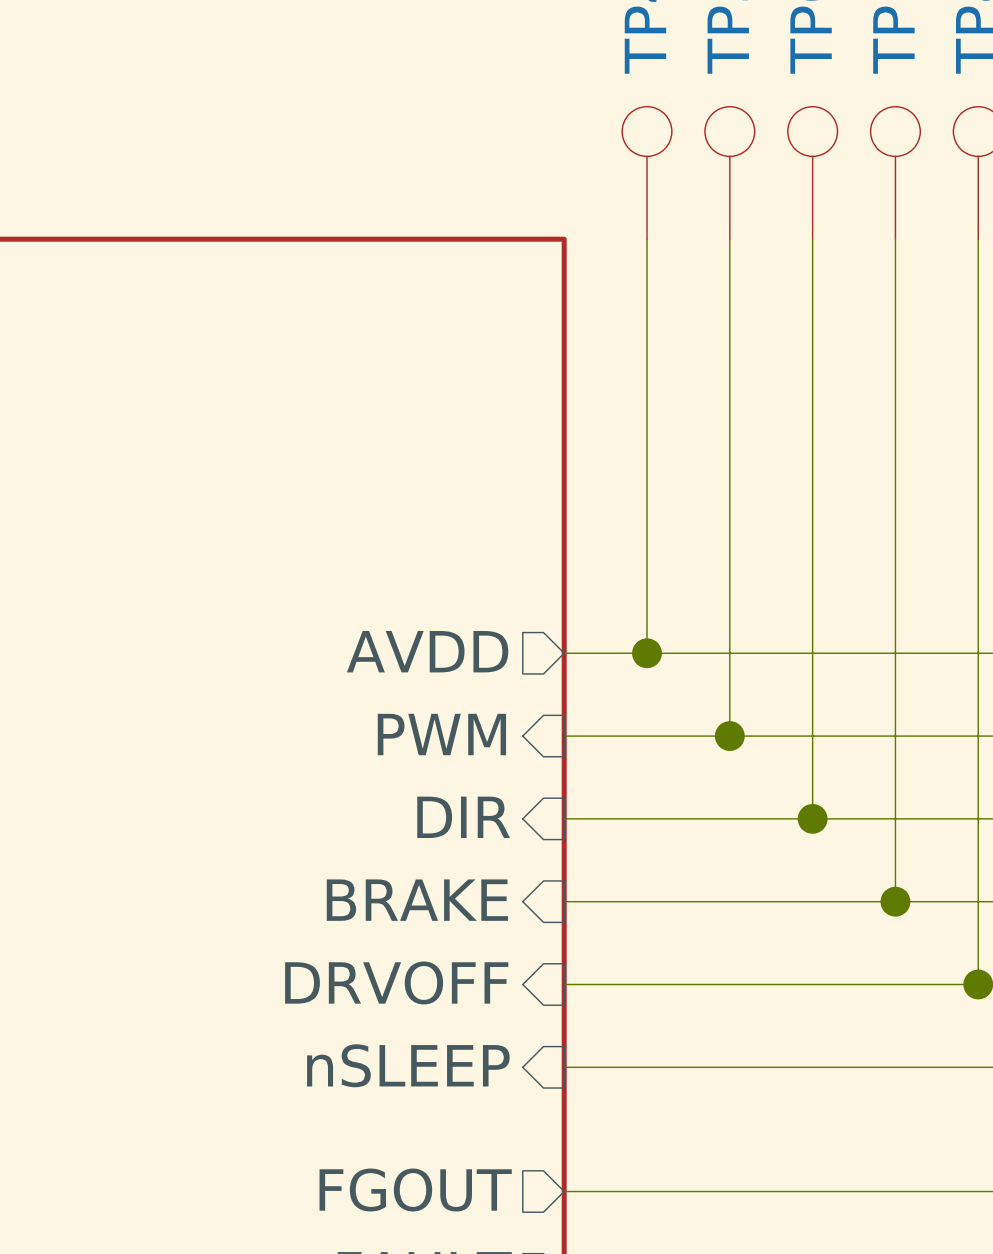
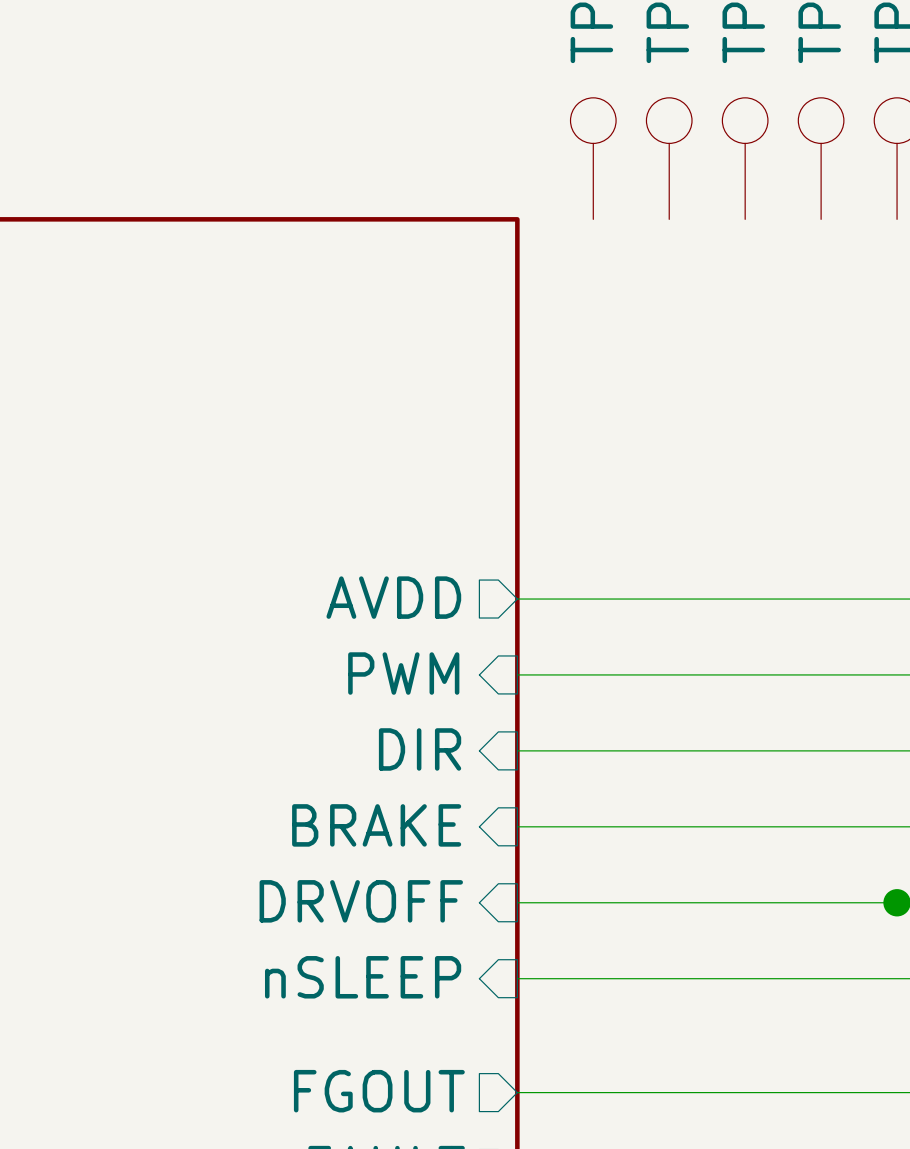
wire: (647, 239) (647, 653) -> none
wire: (729, 239) (729, 736) -> none
wire: (812, 239) (812, 818) -> none
wire: (895, 239) (895, 901) -> none
wire: (978, 239) (978, 984) -> none
junction: (647, 653) -> none
junction: (729, 736) -> none
junction: (812, 818) -> none
junction: (895, 901) -> none

